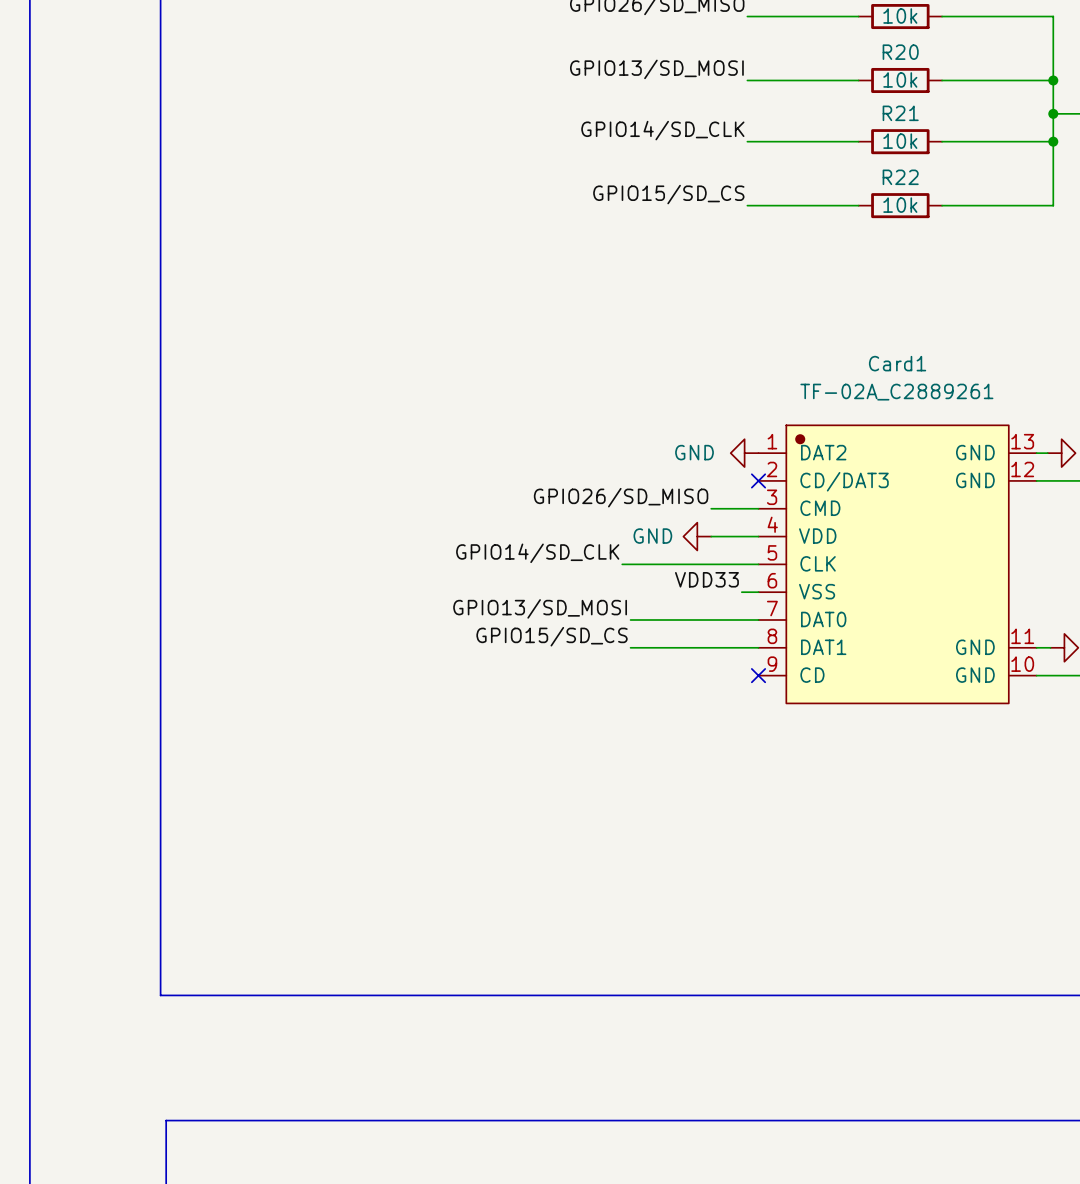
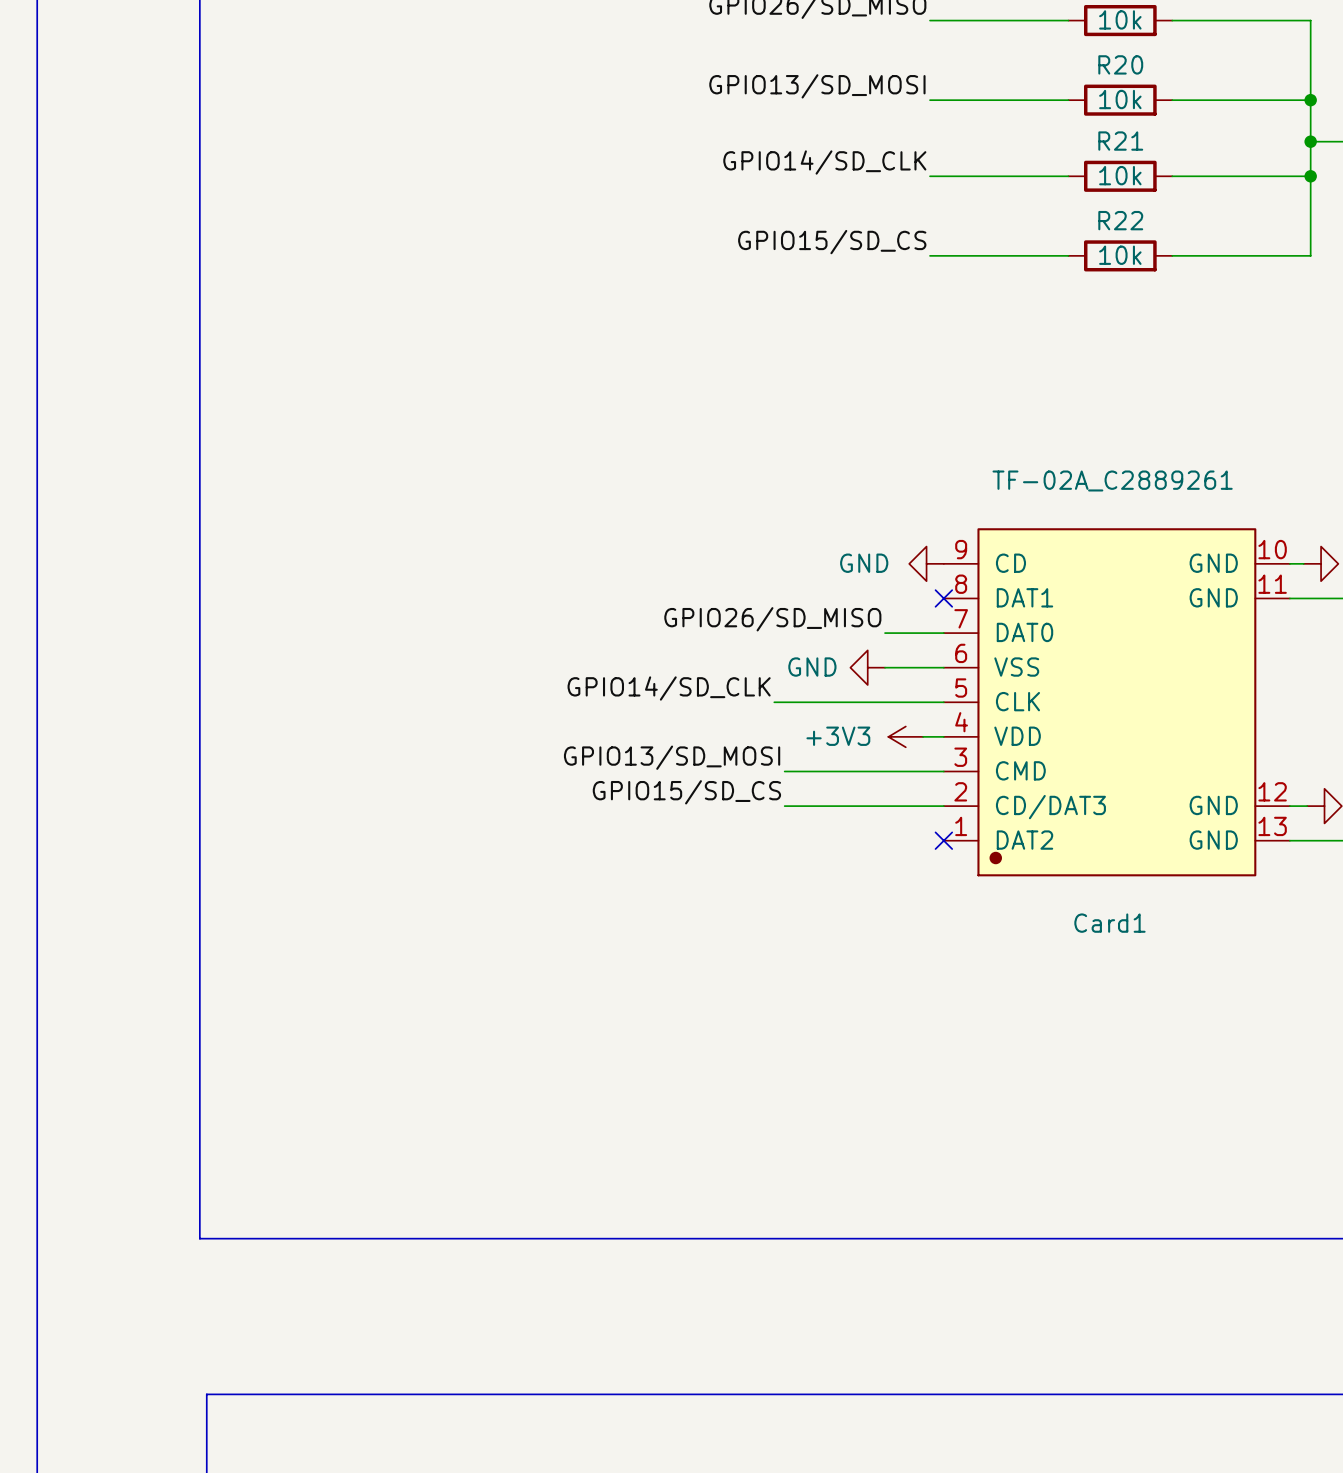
Card1 name position: Card1 (897, 363) -> Card1 (1109, 923)
Card1 flip: as is (897, 564) -> up-down (1116, 702)
label: VDD33 (706, 579) -> none
power symbol: none -> +3V3 (905, 736)

